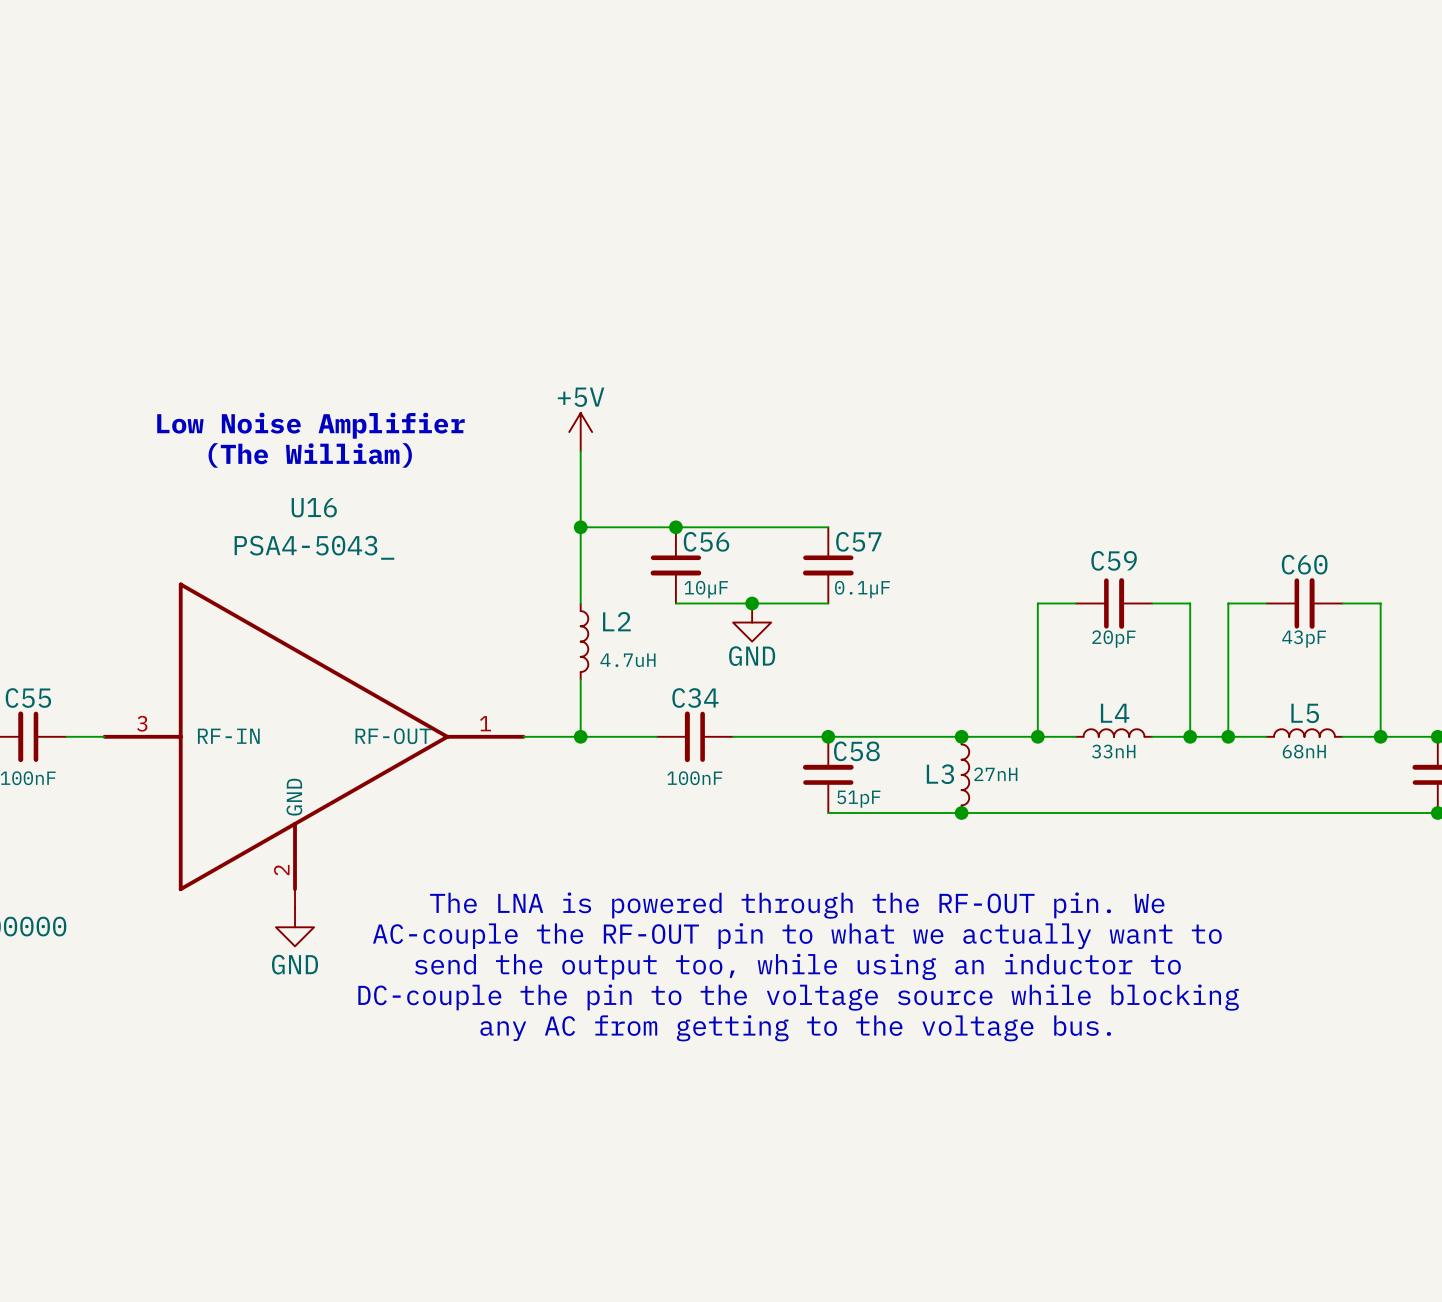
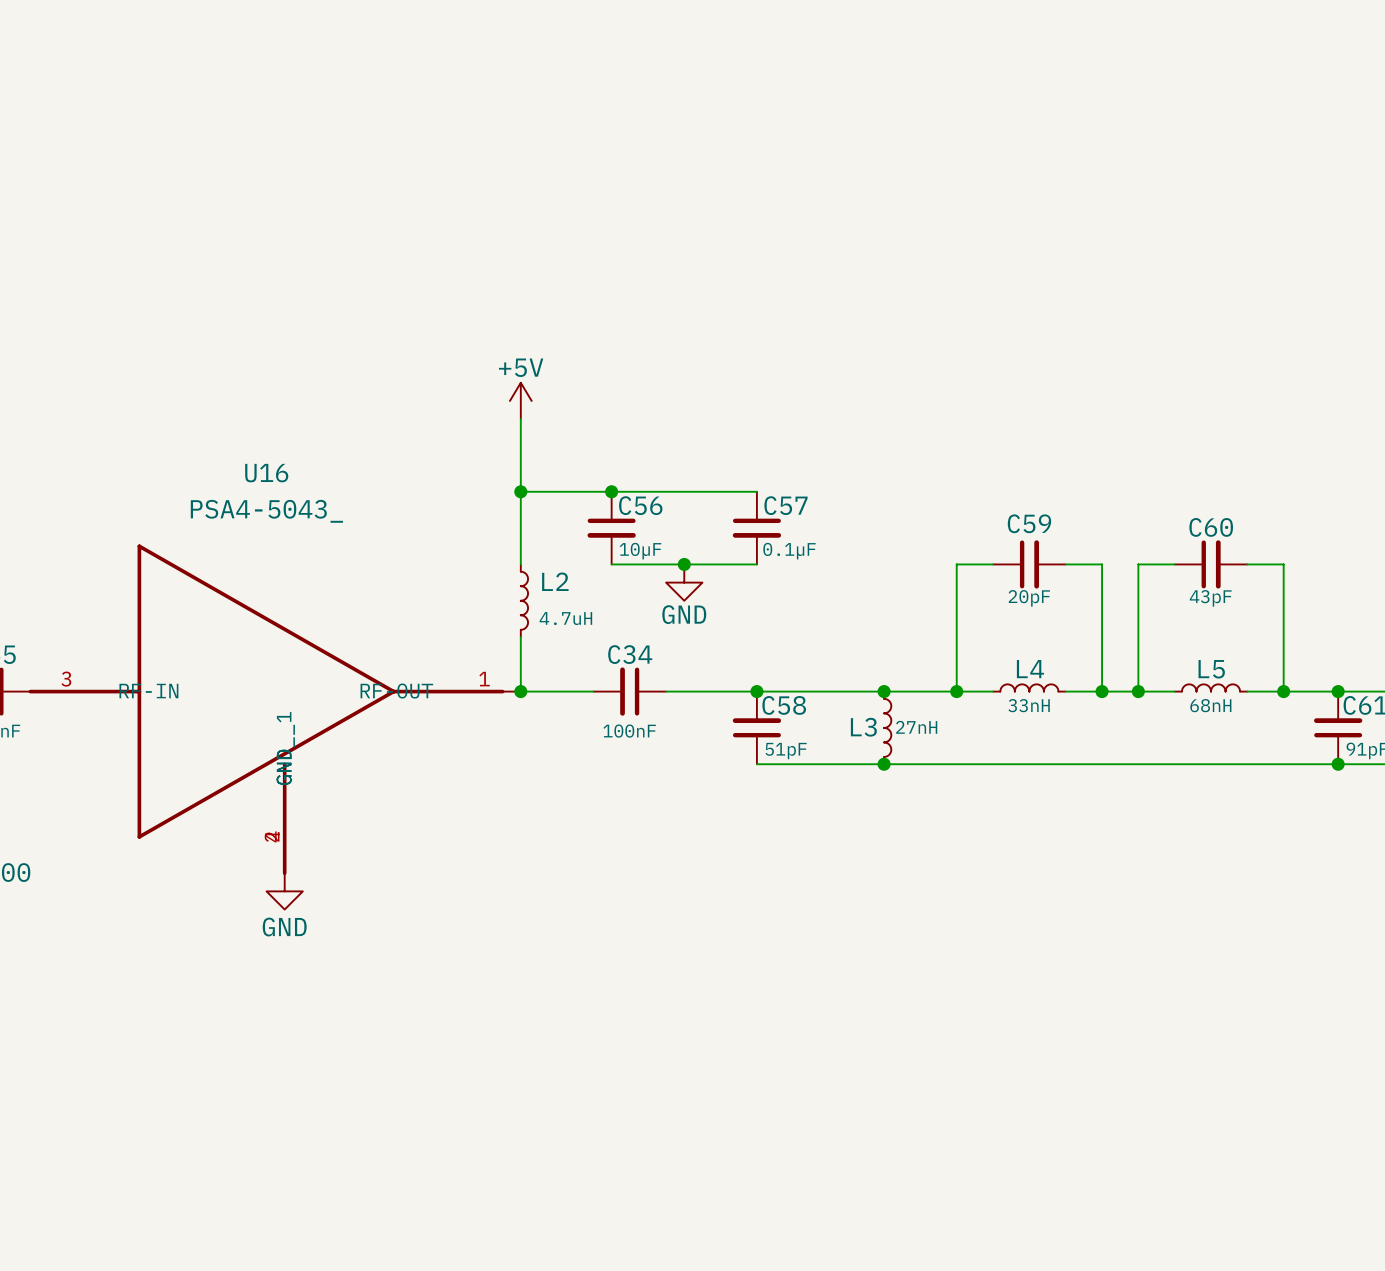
text: Low Noise Amplifier (310, 425) -> none
text: (The William) (310, 455) -> none
U16 symbol: [102, 582, 526, 909] -> [28, 544, 521, 876]
text: The LNA is powered through the RF-OUT pin. We (797, 905) -> none
power symbol position: GND (295, 927) -> GND (284, 891)
text: AC-couple the RF-OUT pin to what we actually want to (797, 936) -> none
text: send the output too, while using an inductor to (797, 966) -> none
text: DC-couple the pin to the voltage source while blocking (798, 997) -> none
text: any AC from getting to the voltage bus. (795, 1028) -> none

